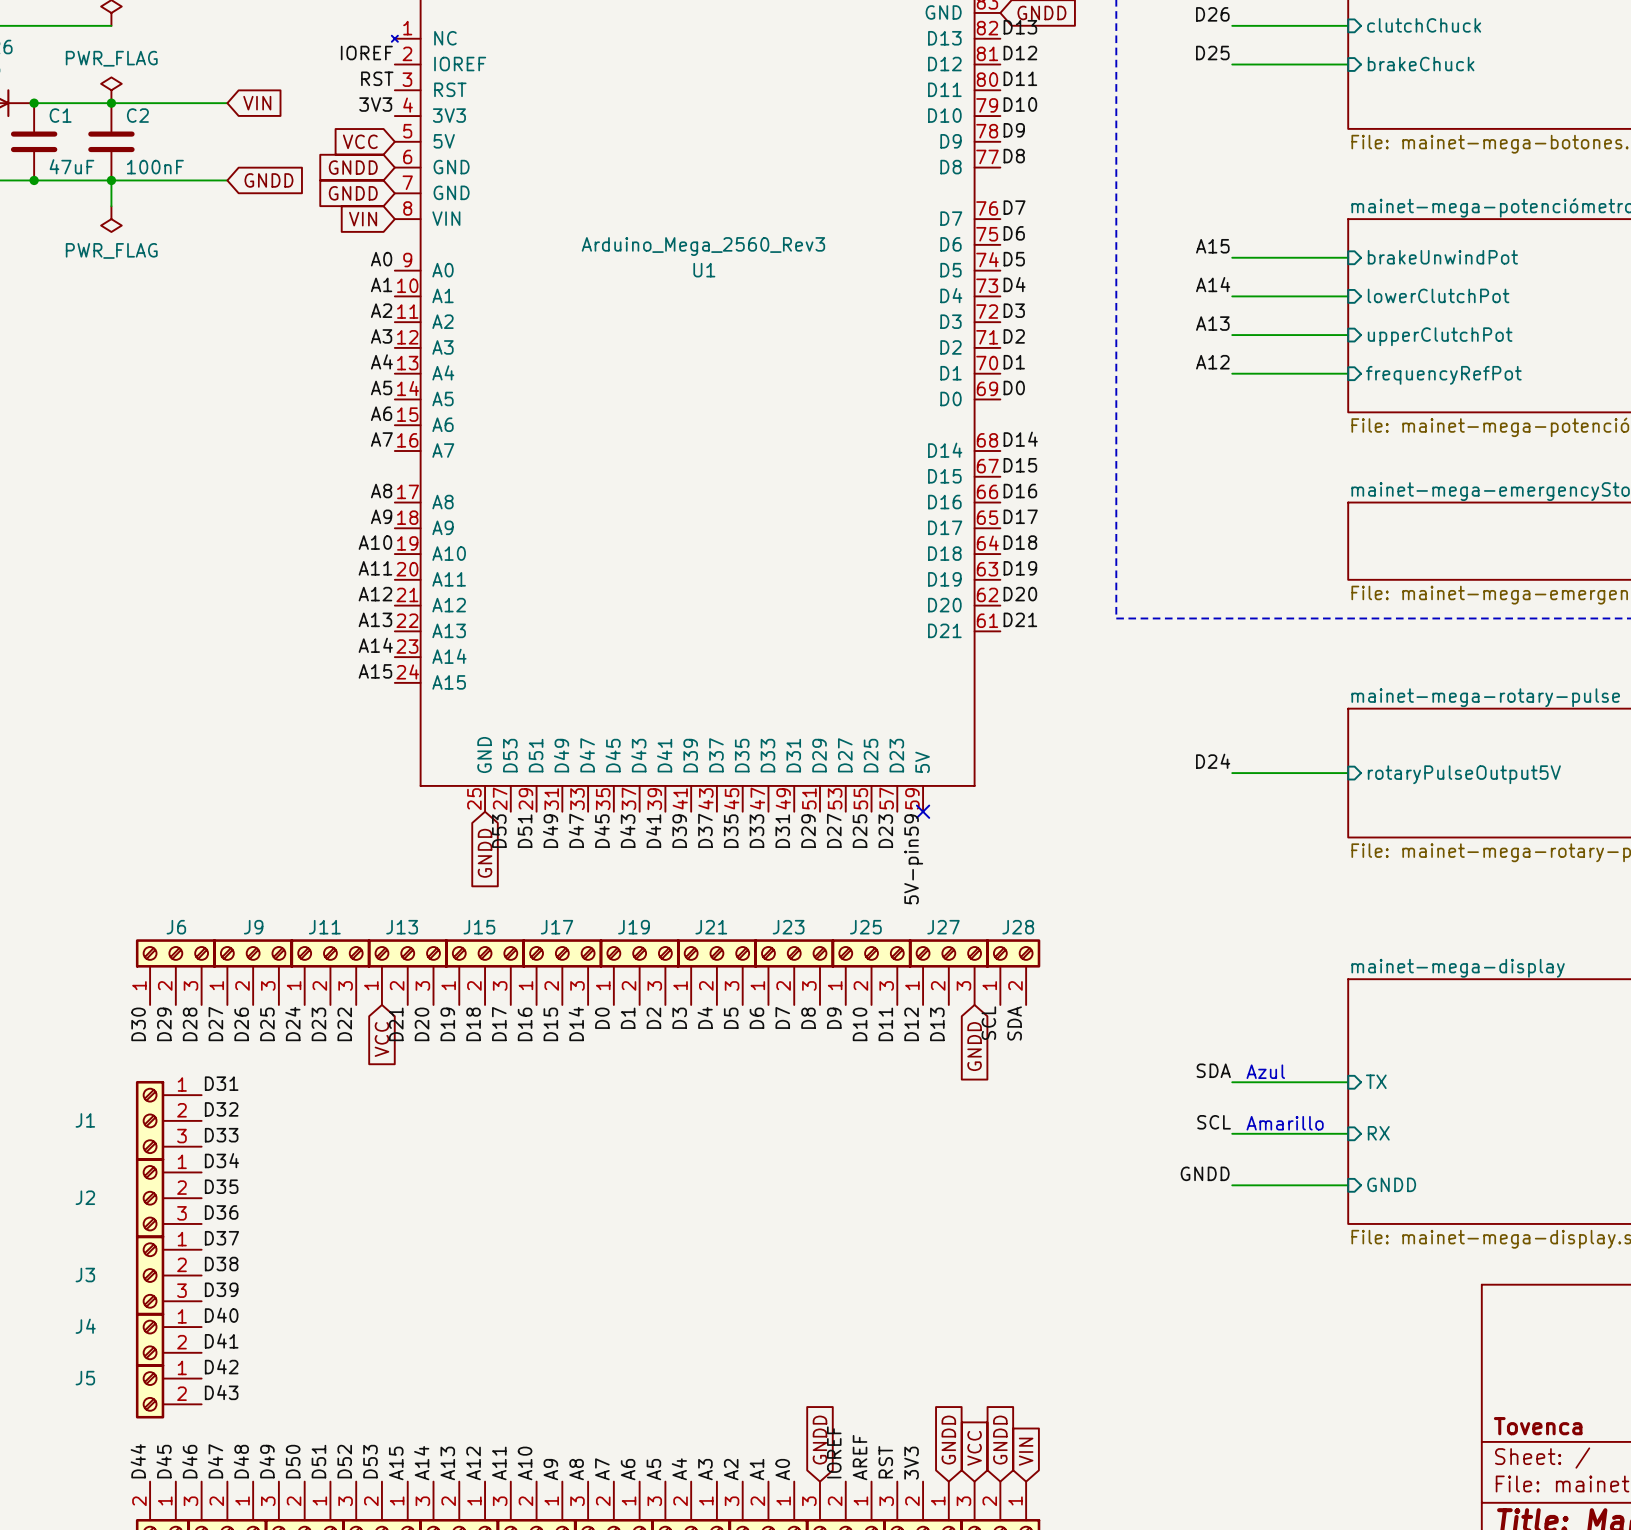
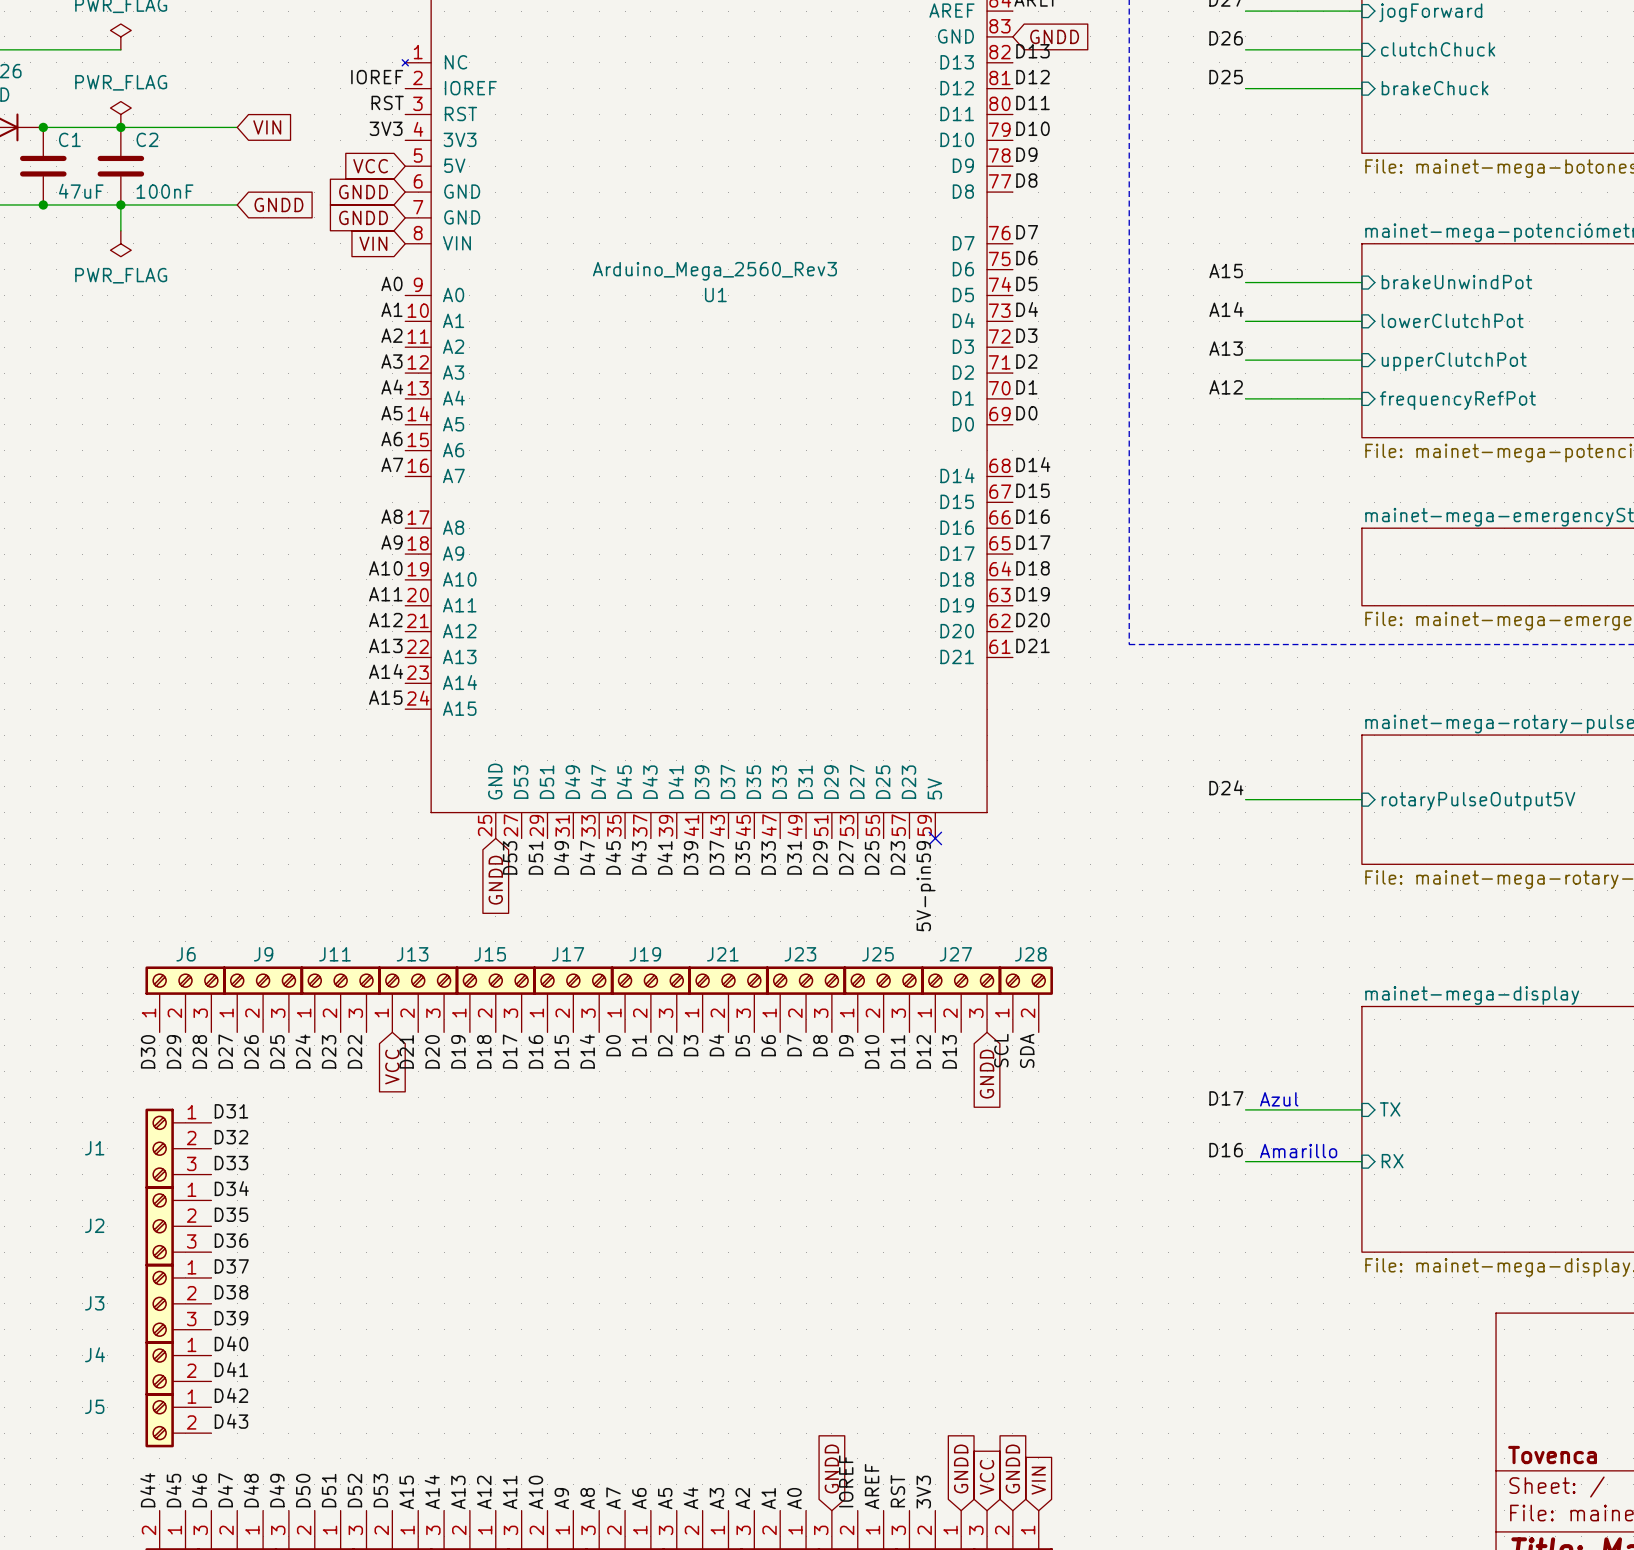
label: SDA (1213, 1070) -> D17 (1226, 1098)
label: SCL (1214, 1122) -> D16 (1226, 1150)
label: GNDD (1205, 1173) -> none
sheet pin: GNDD (1391, 1184) -> none
wire: (1232, 1185) (1348, 1185) -> none

